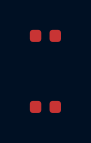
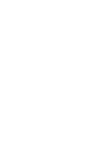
part: (45, 35) -> none
part: (45, 106) -> none

